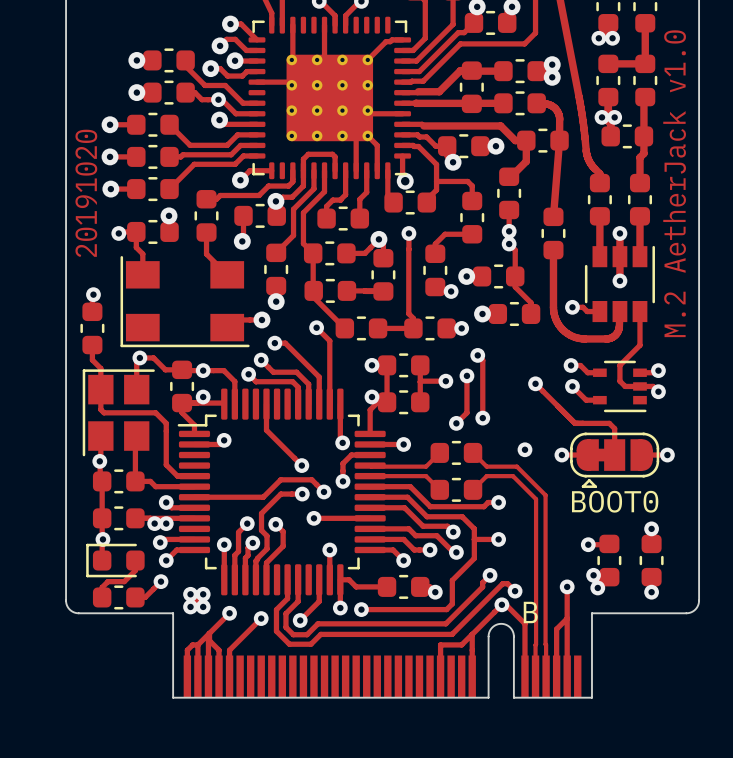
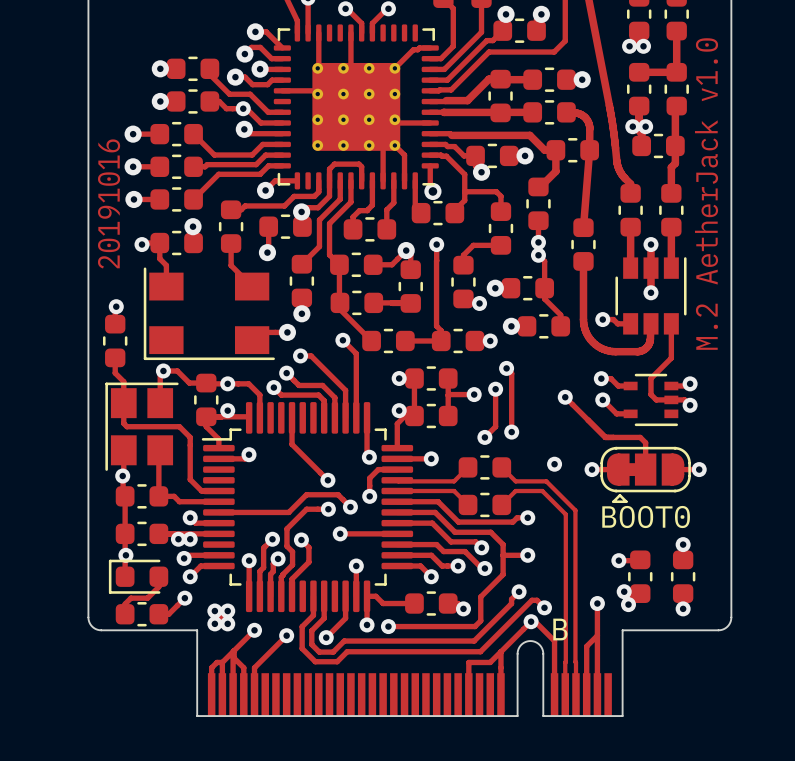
via: (552, 64) -> none
via: none -> (582, 79)
via: (552, 77) -> none
text: 20191020 (86, 193) -> 20191016 (109, 203)

